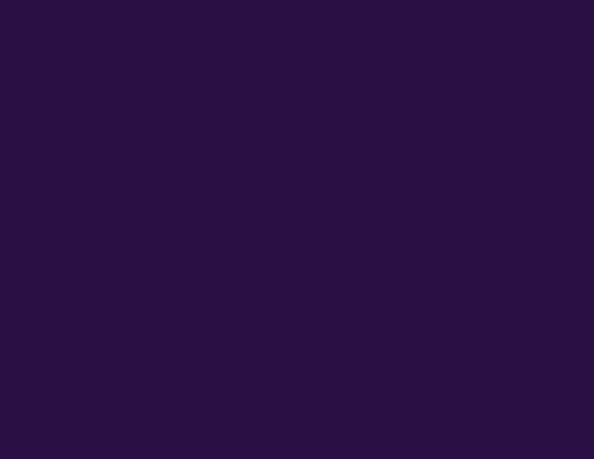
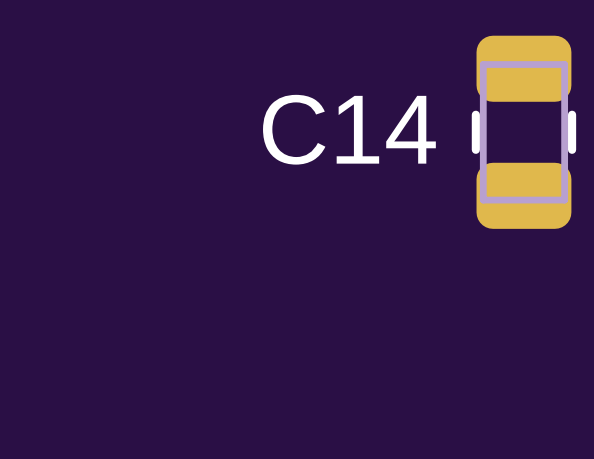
C14: none -> (523, 132)

